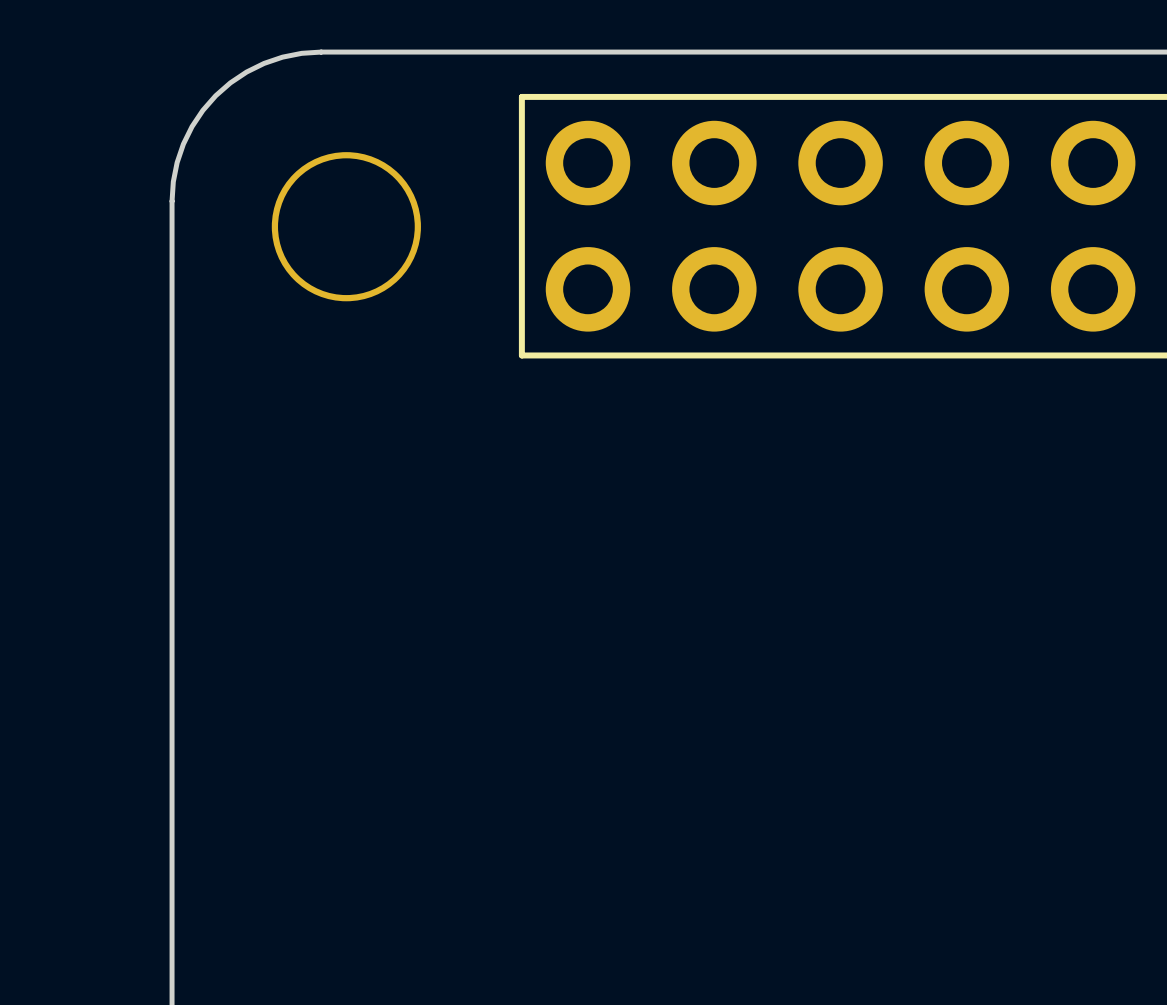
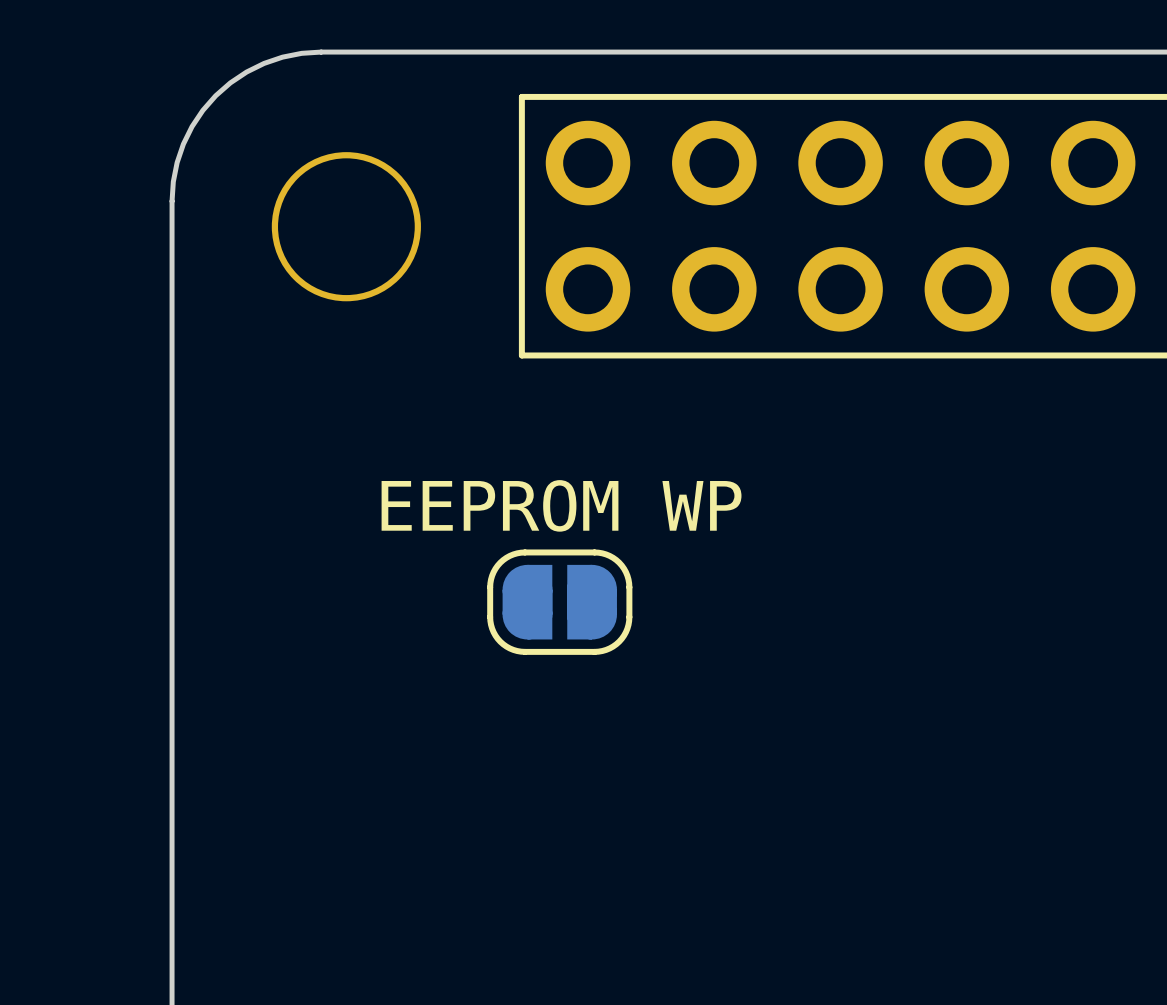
part: none -> EEPROM WP (559, 602)

